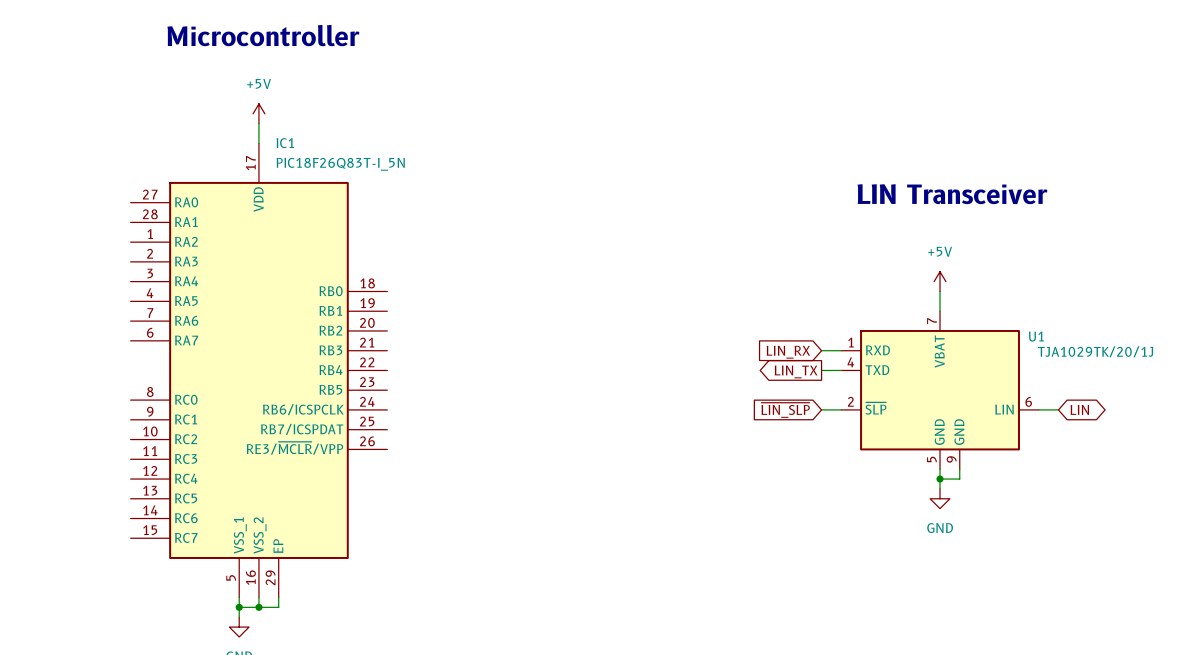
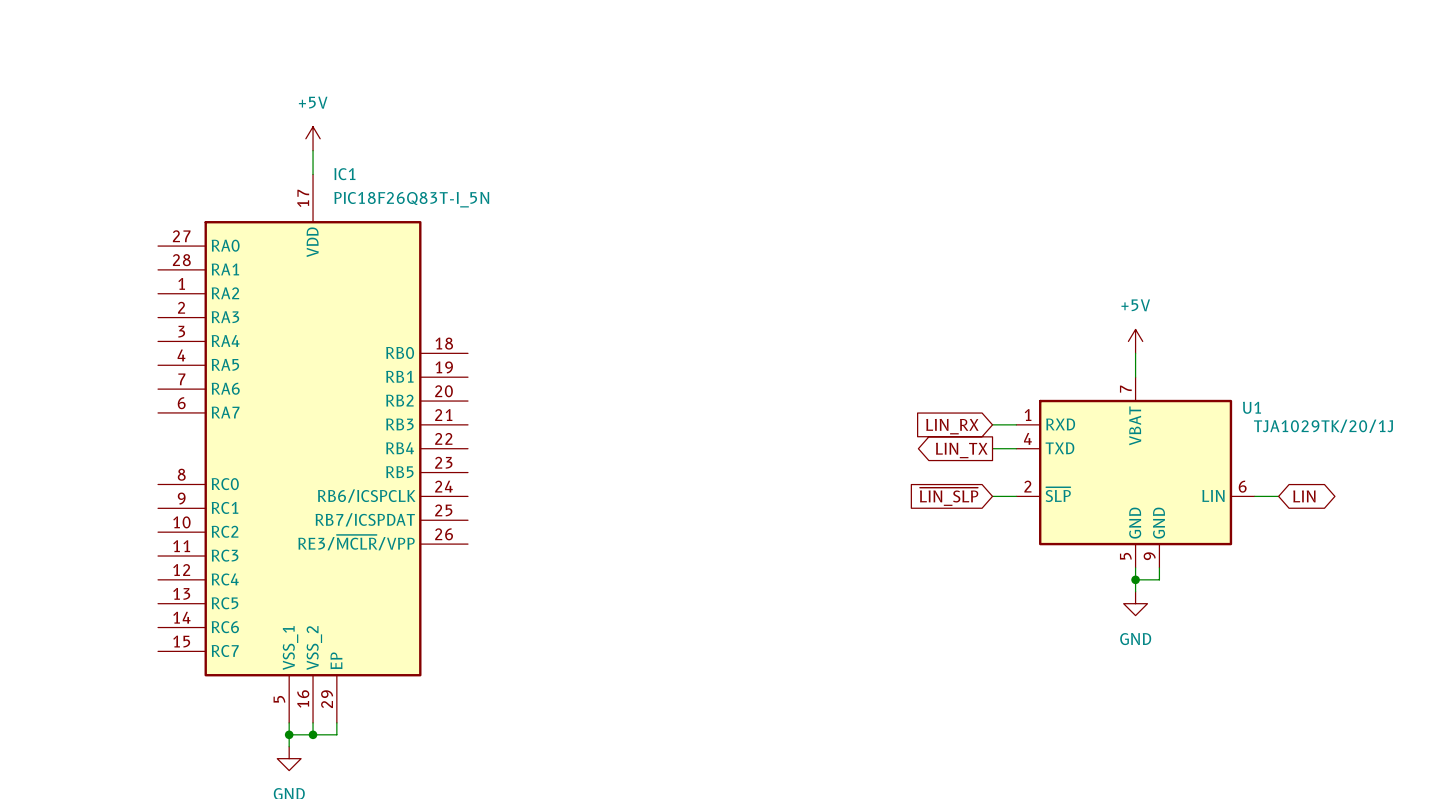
text: Microcontroller (263, 35) -> none
text: LIN Transceiver (952, 194) -> none

